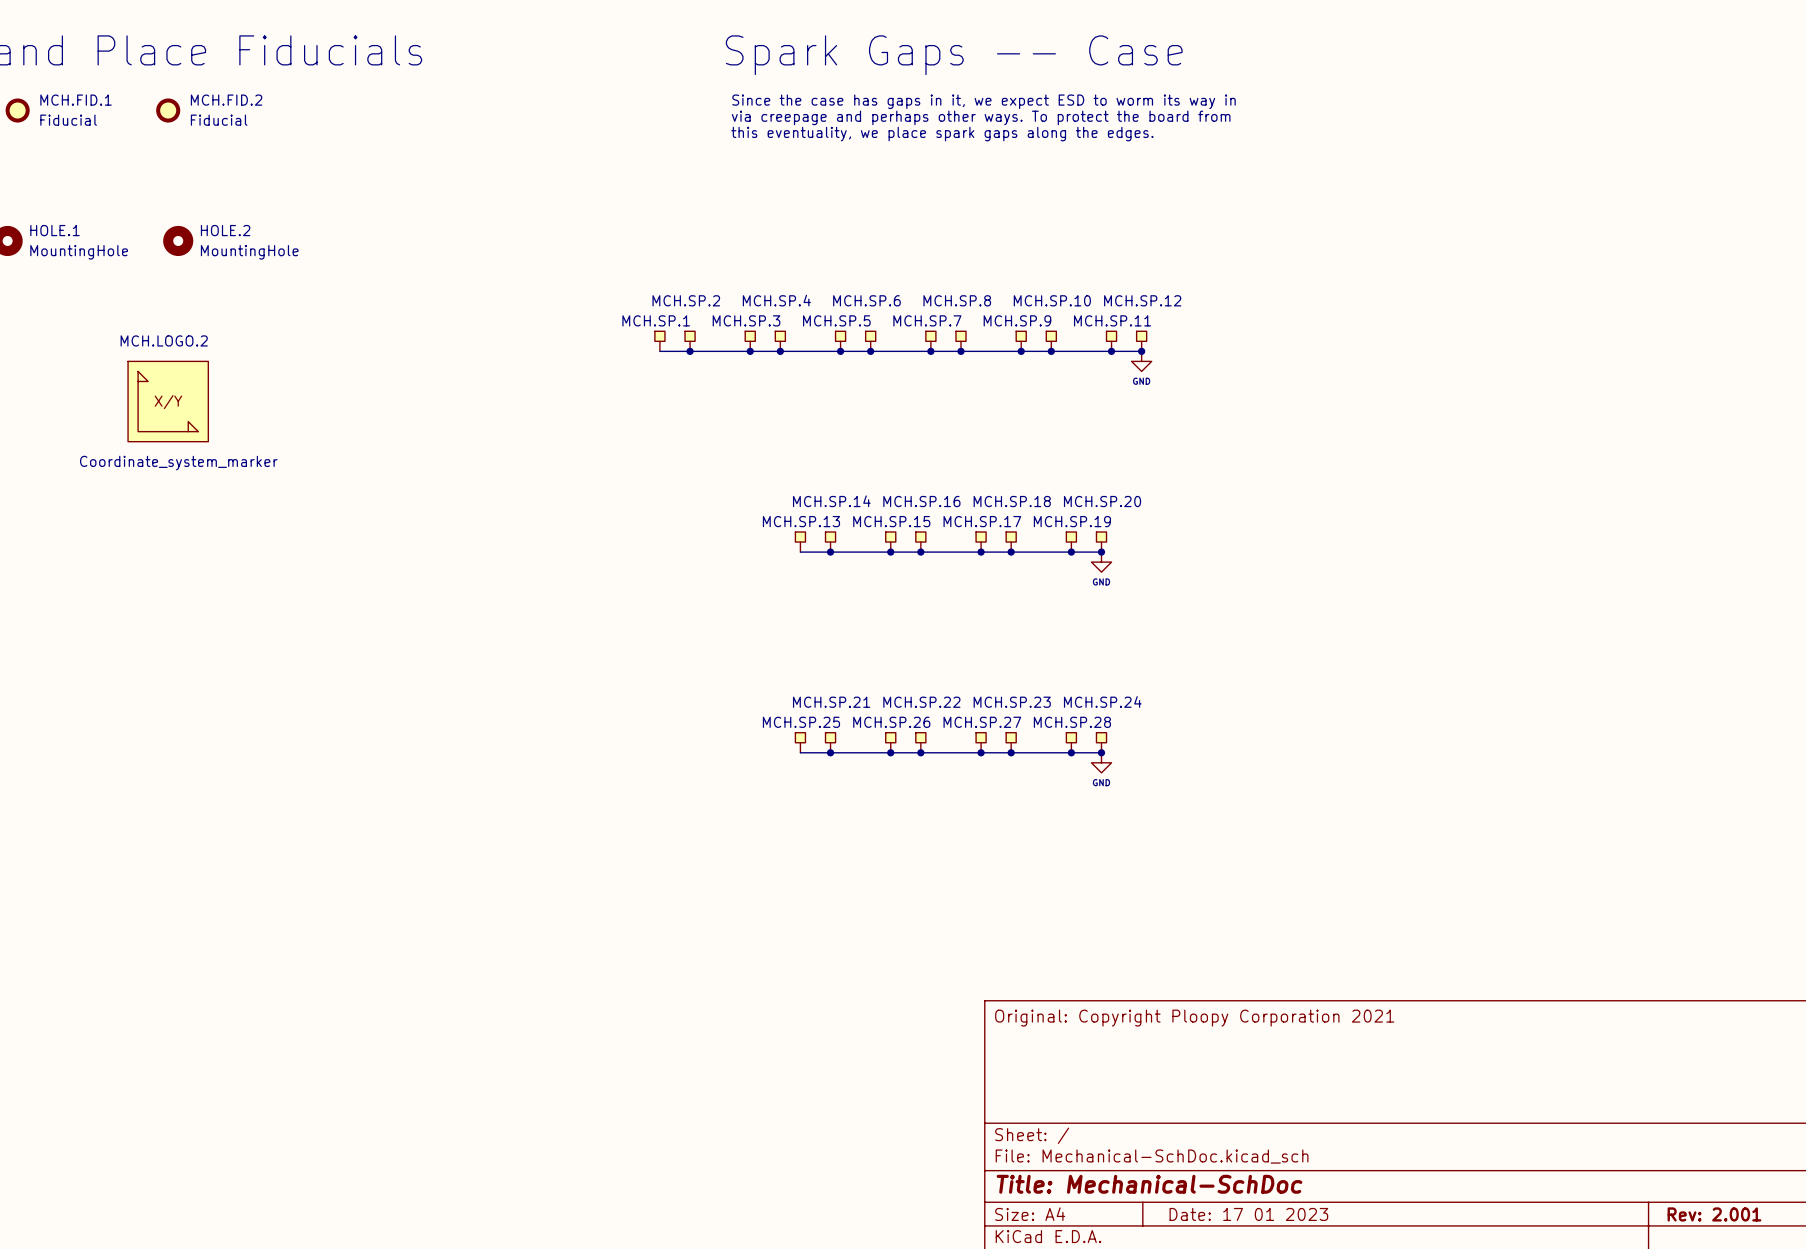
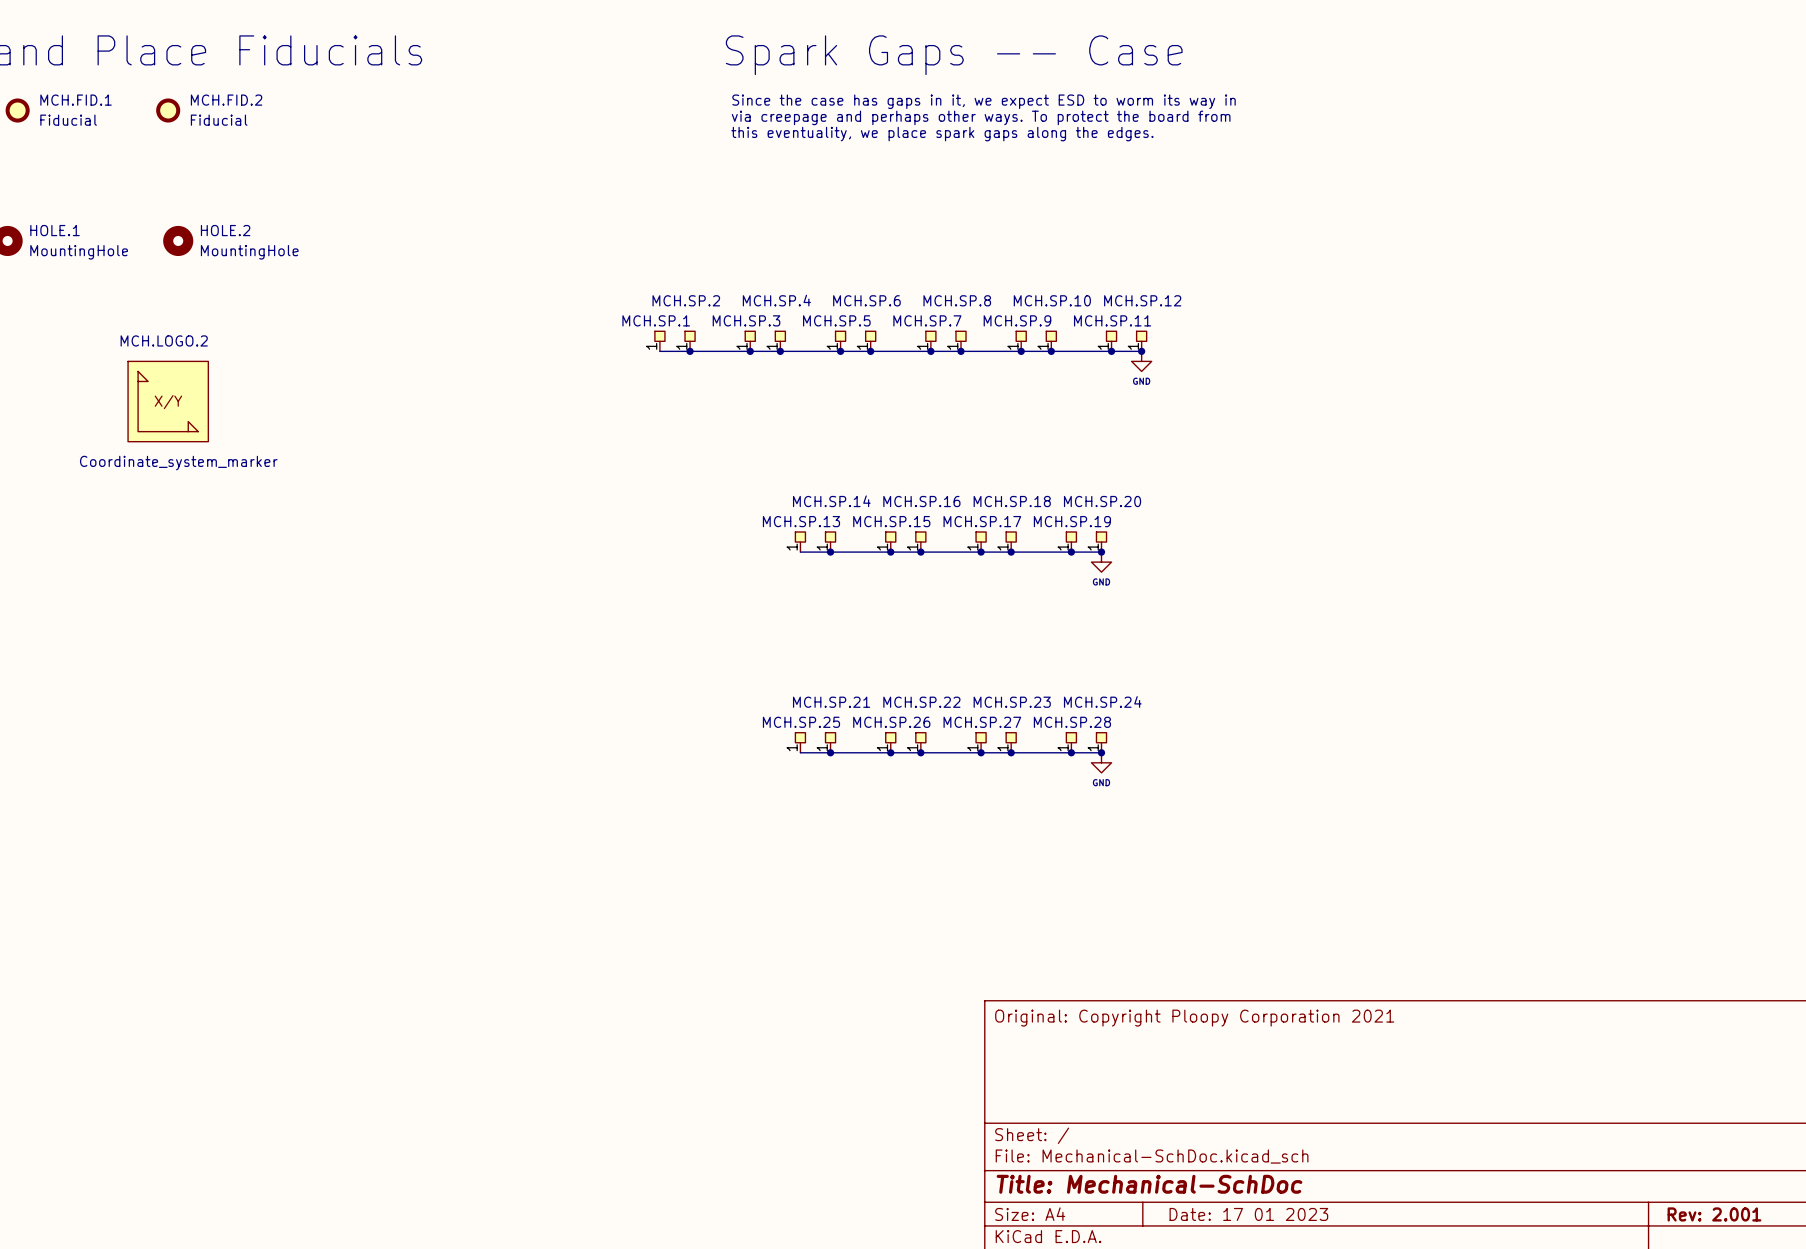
MCH.SP.1 pin number: none -> 1 (651, 346)
MCH.SP.2 pin number: none -> 1 (681, 346)
MCH.SP.3 pin number: none -> 1 (741, 346)
MCH.SP.4 pin number: none -> 1 (772, 346)
MCH.SP.5 pin number: none -> 1 (832, 346)
MCH.SP.6 pin number: none -> 1 (862, 346)
MCH.SP.7 pin number: none -> 1 (922, 346)
MCH.SP.8 pin number: none -> 1 (952, 346)
MCH.SP.9 pin number: none -> 1 (1012, 346)
MCH.SP.10 pin number: none -> 1 (1043, 346)
MCH.SP.11 pin number: none -> 1 (1103, 346)
MCH.SP.12 pin number: none -> 1 (1133, 346)
MCH.SP.13 pin number: none -> 1 (792, 547)
MCH.SP.14 pin number: none -> 1 (822, 547)
MCH.SP.15 pin number: none -> 1 (882, 547)
MCH.SP.16 pin number: none -> 1 (912, 547)
MCH.SP.17 pin number: none -> 1 (972, 547)
MCH.SP.18 pin number: none -> 1 (1002, 547)
MCH.SP.19 pin number: none -> 1 (1063, 547)
MCH.SP.20 pin number: none -> 1 (1093, 547)
MCH.SP.25 pin number: none -> 1 (792, 747)
MCH.SP.21 pin number: none -> 1 (822, 747)
MCH.SP.26 pin number: none -> 1 (882, 747)
MCH.SP.22 pin number: none -> 1 (912, 747)
MCH.SP.27 pin number: none -> 1 (972, 747)
MCH.SP.23 pin number: none -> 1 (1002, 747)
MCH.SP.28 pin number: none -> 1 (1063, 747)
MCH.SP.24 pin number: none -> 1 (1093, 747)

